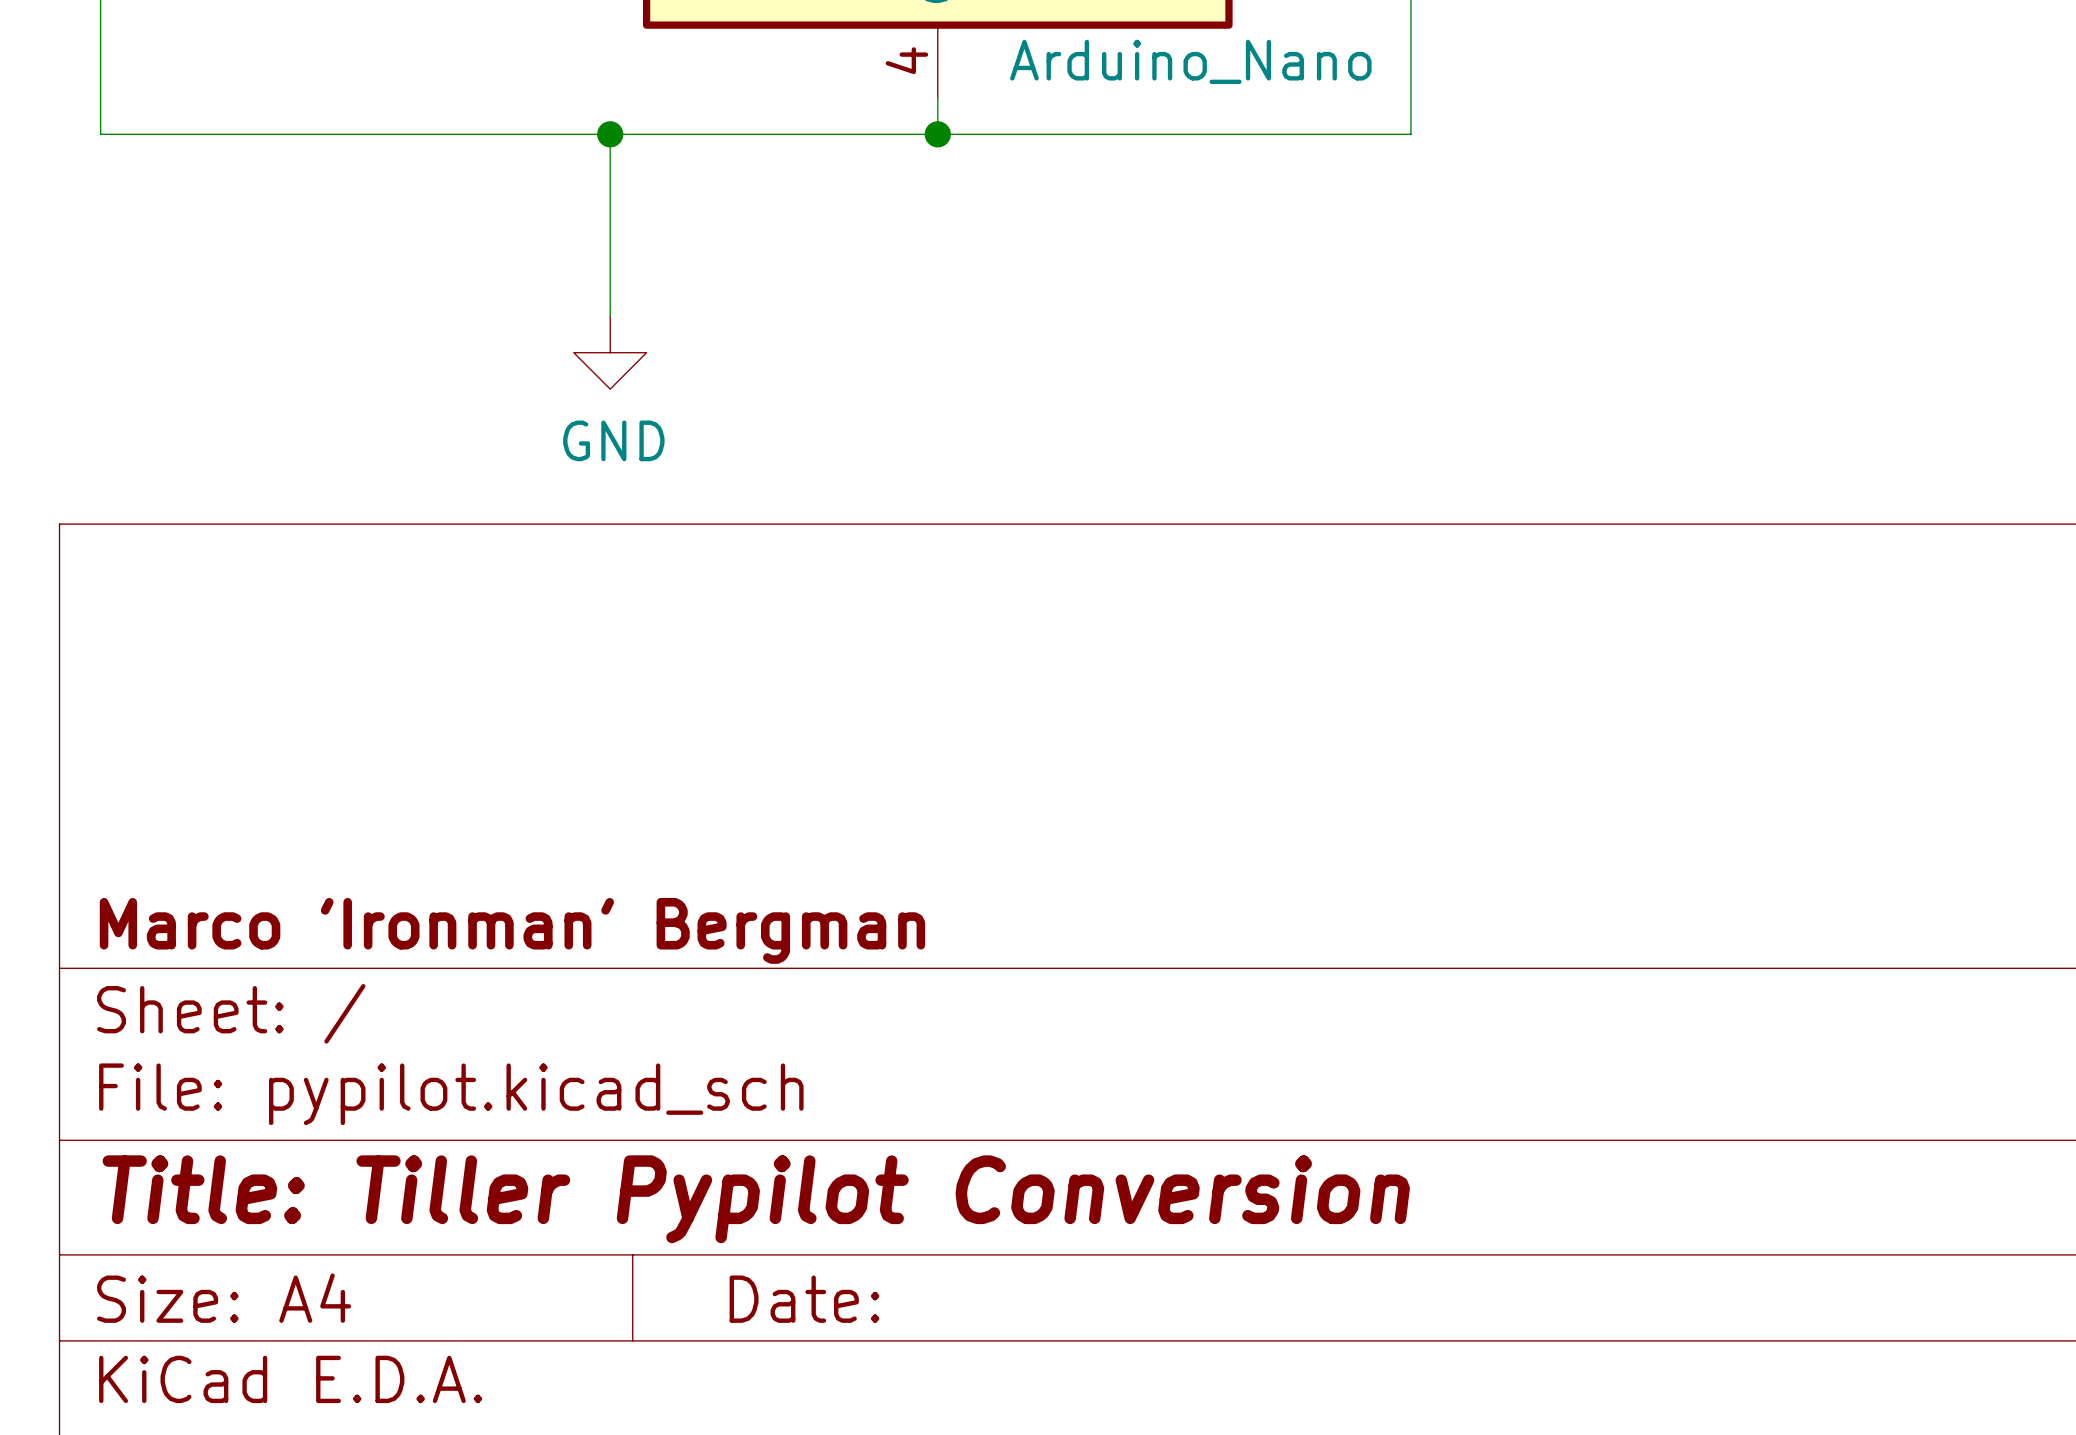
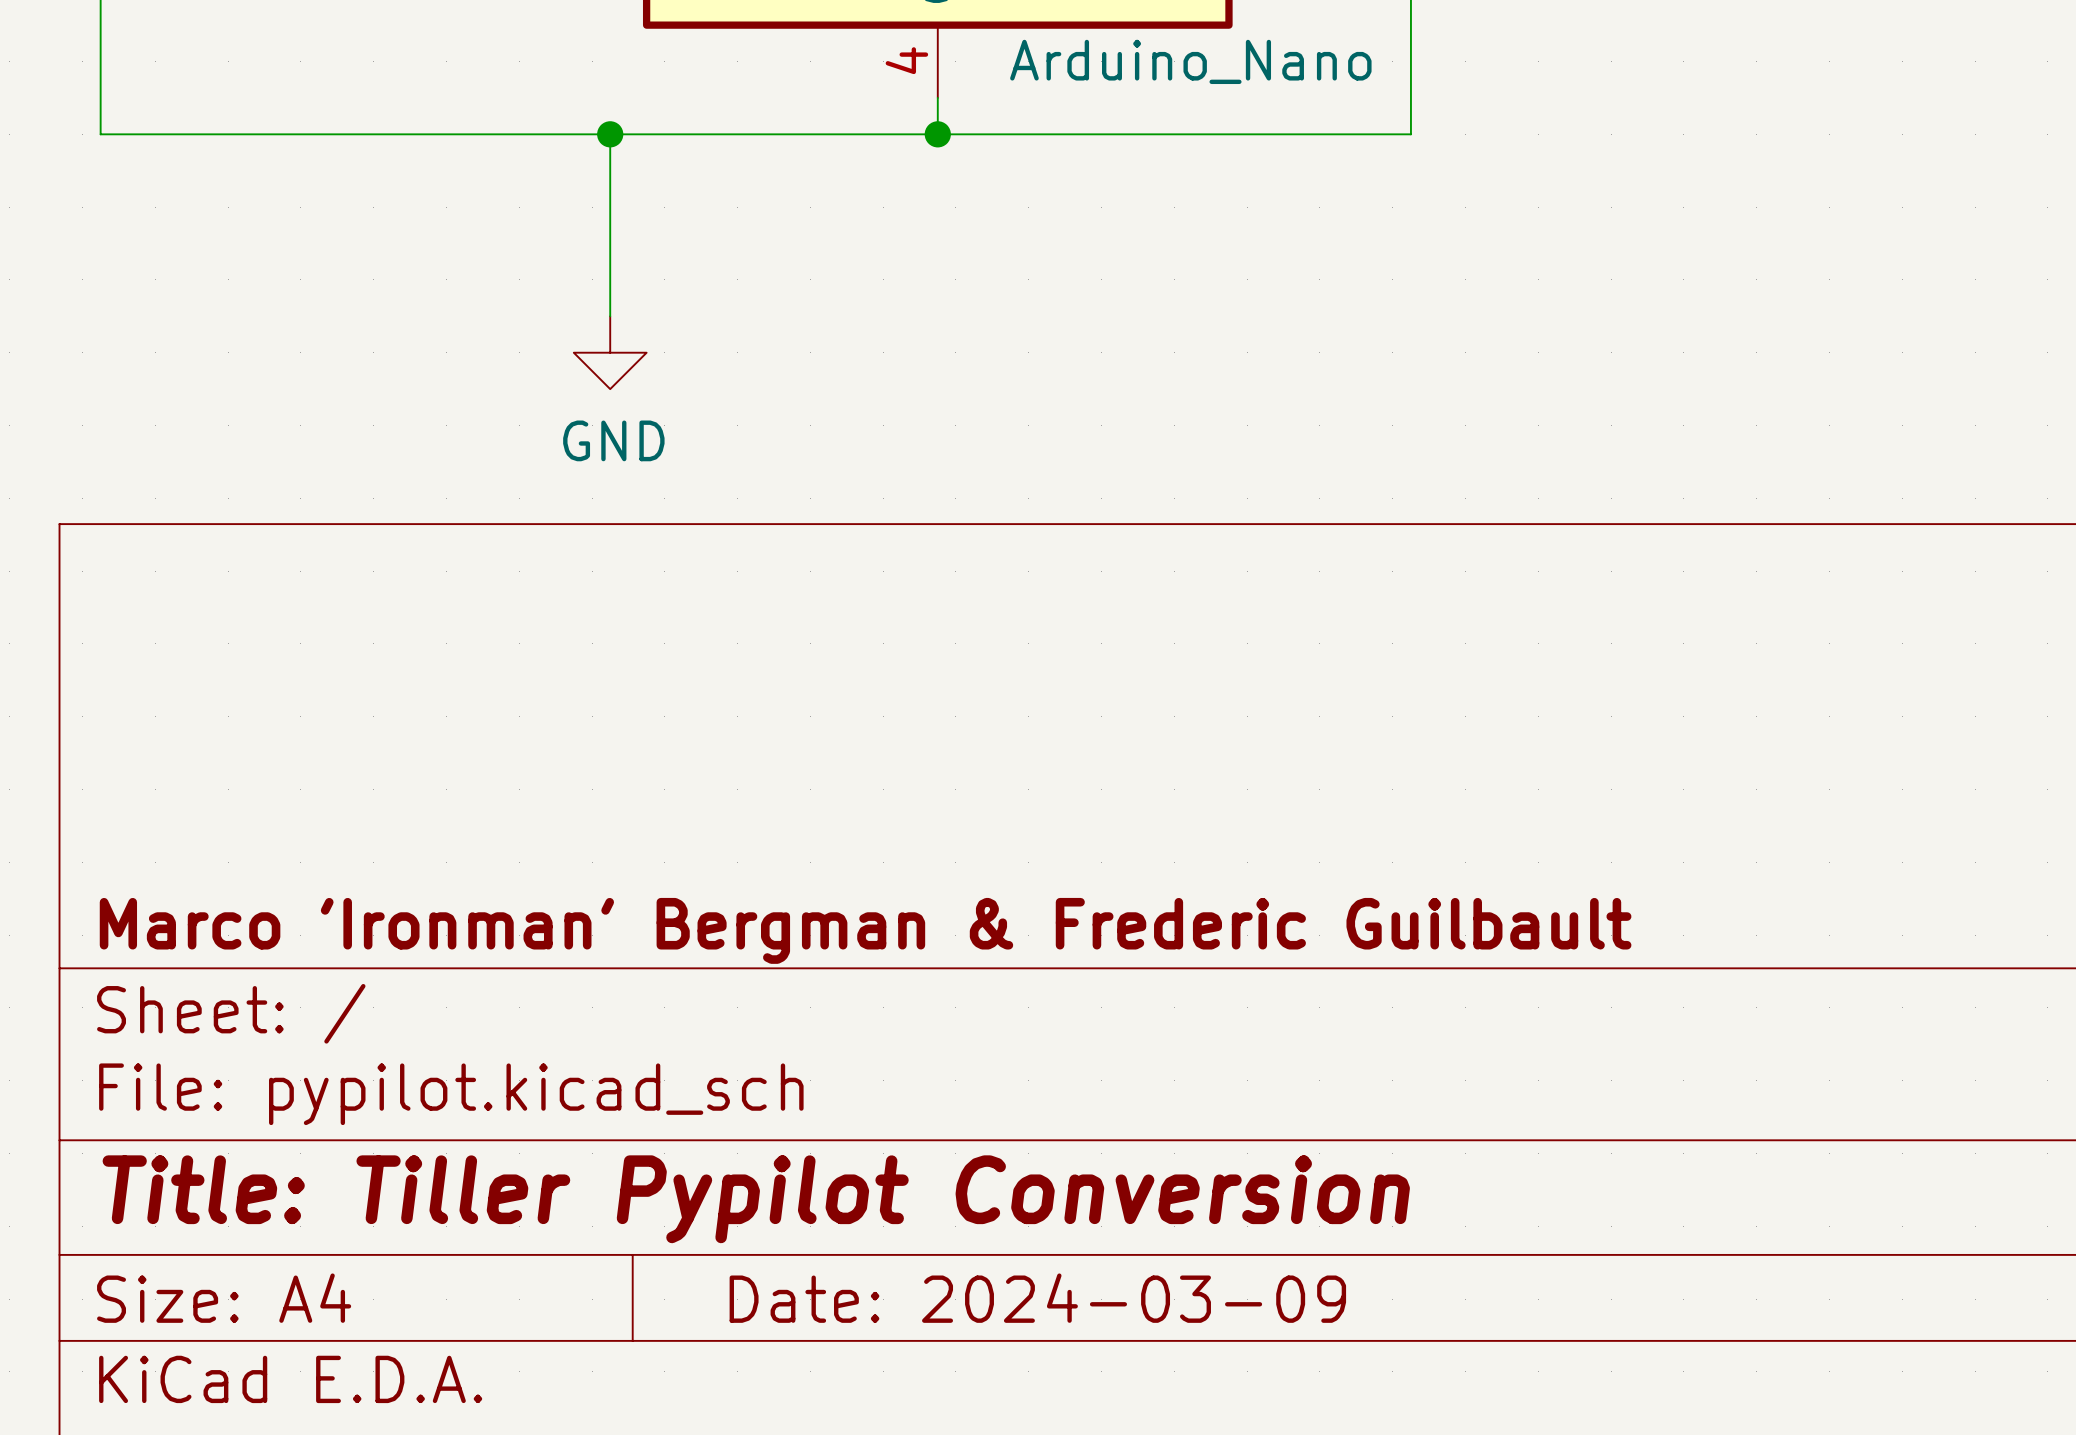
title block: Marco 'Ironman' Bergman (512, 930) -> Marco 'Ironman' Bergman & Frederic Guilbault (865, 930)
title block: Date: (804, 1299) -> Date: 2024-03-09 (1037, 1298)

